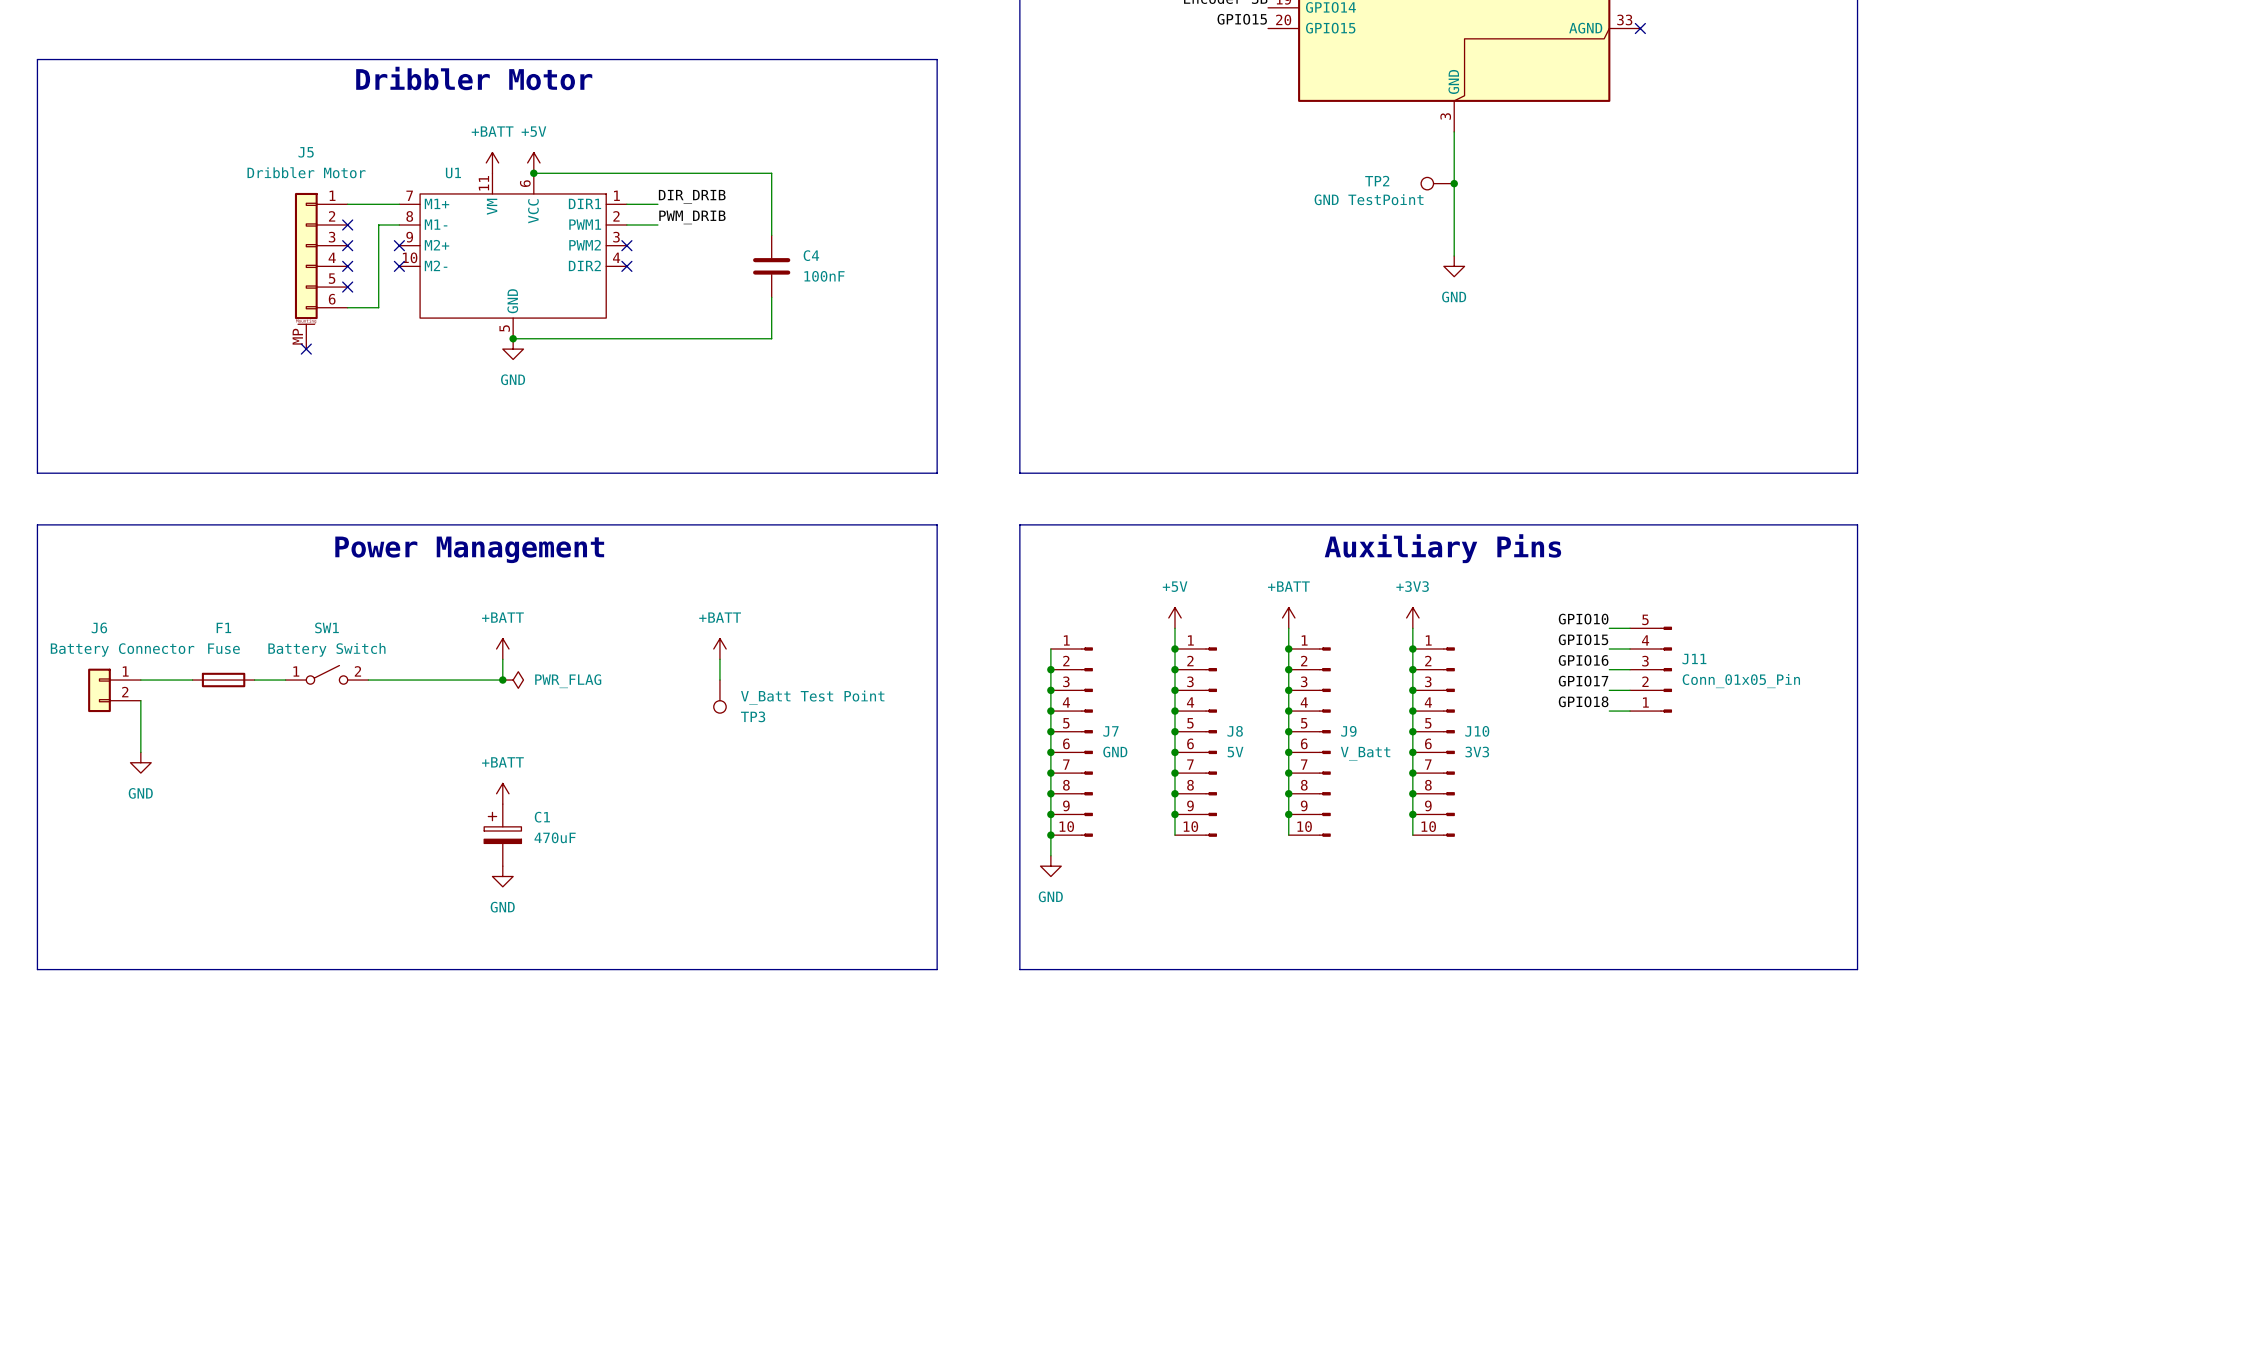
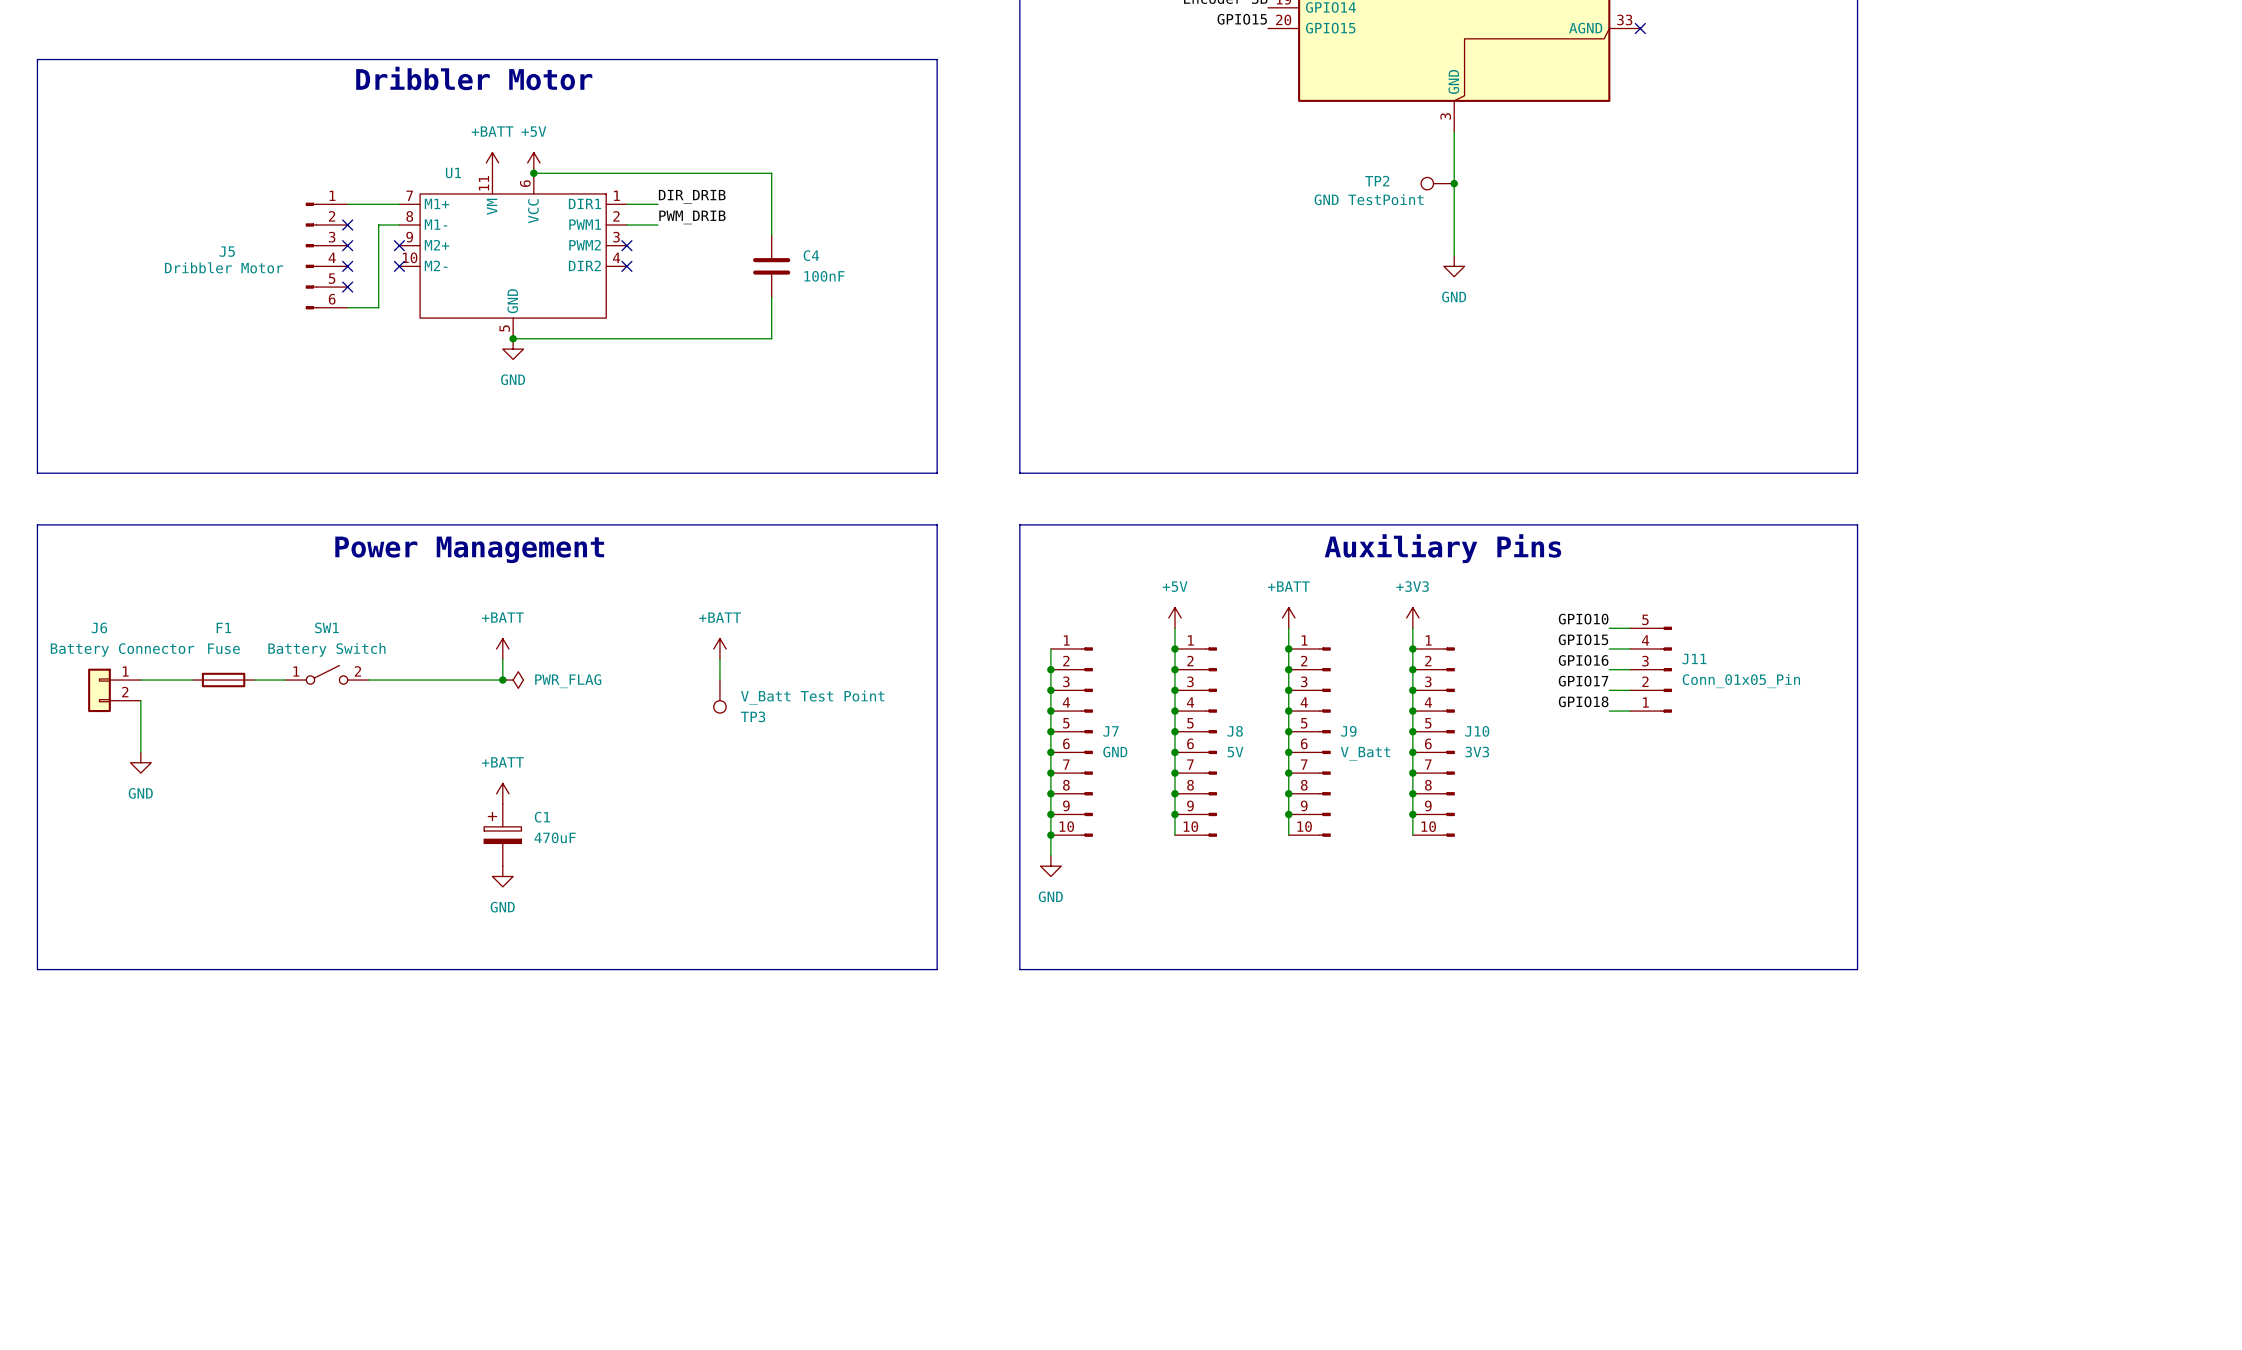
J5 name position: J5 (306, 152) -> J5 (227, 251)
J5 value position: Dribbler Motor (306, 172) -> Dribbler Motor (223, 267)
J5 symbol: [294, 192, 348, 350] -> [305, 202, 348, 310]
no-connect mark: (306, 349) -> none

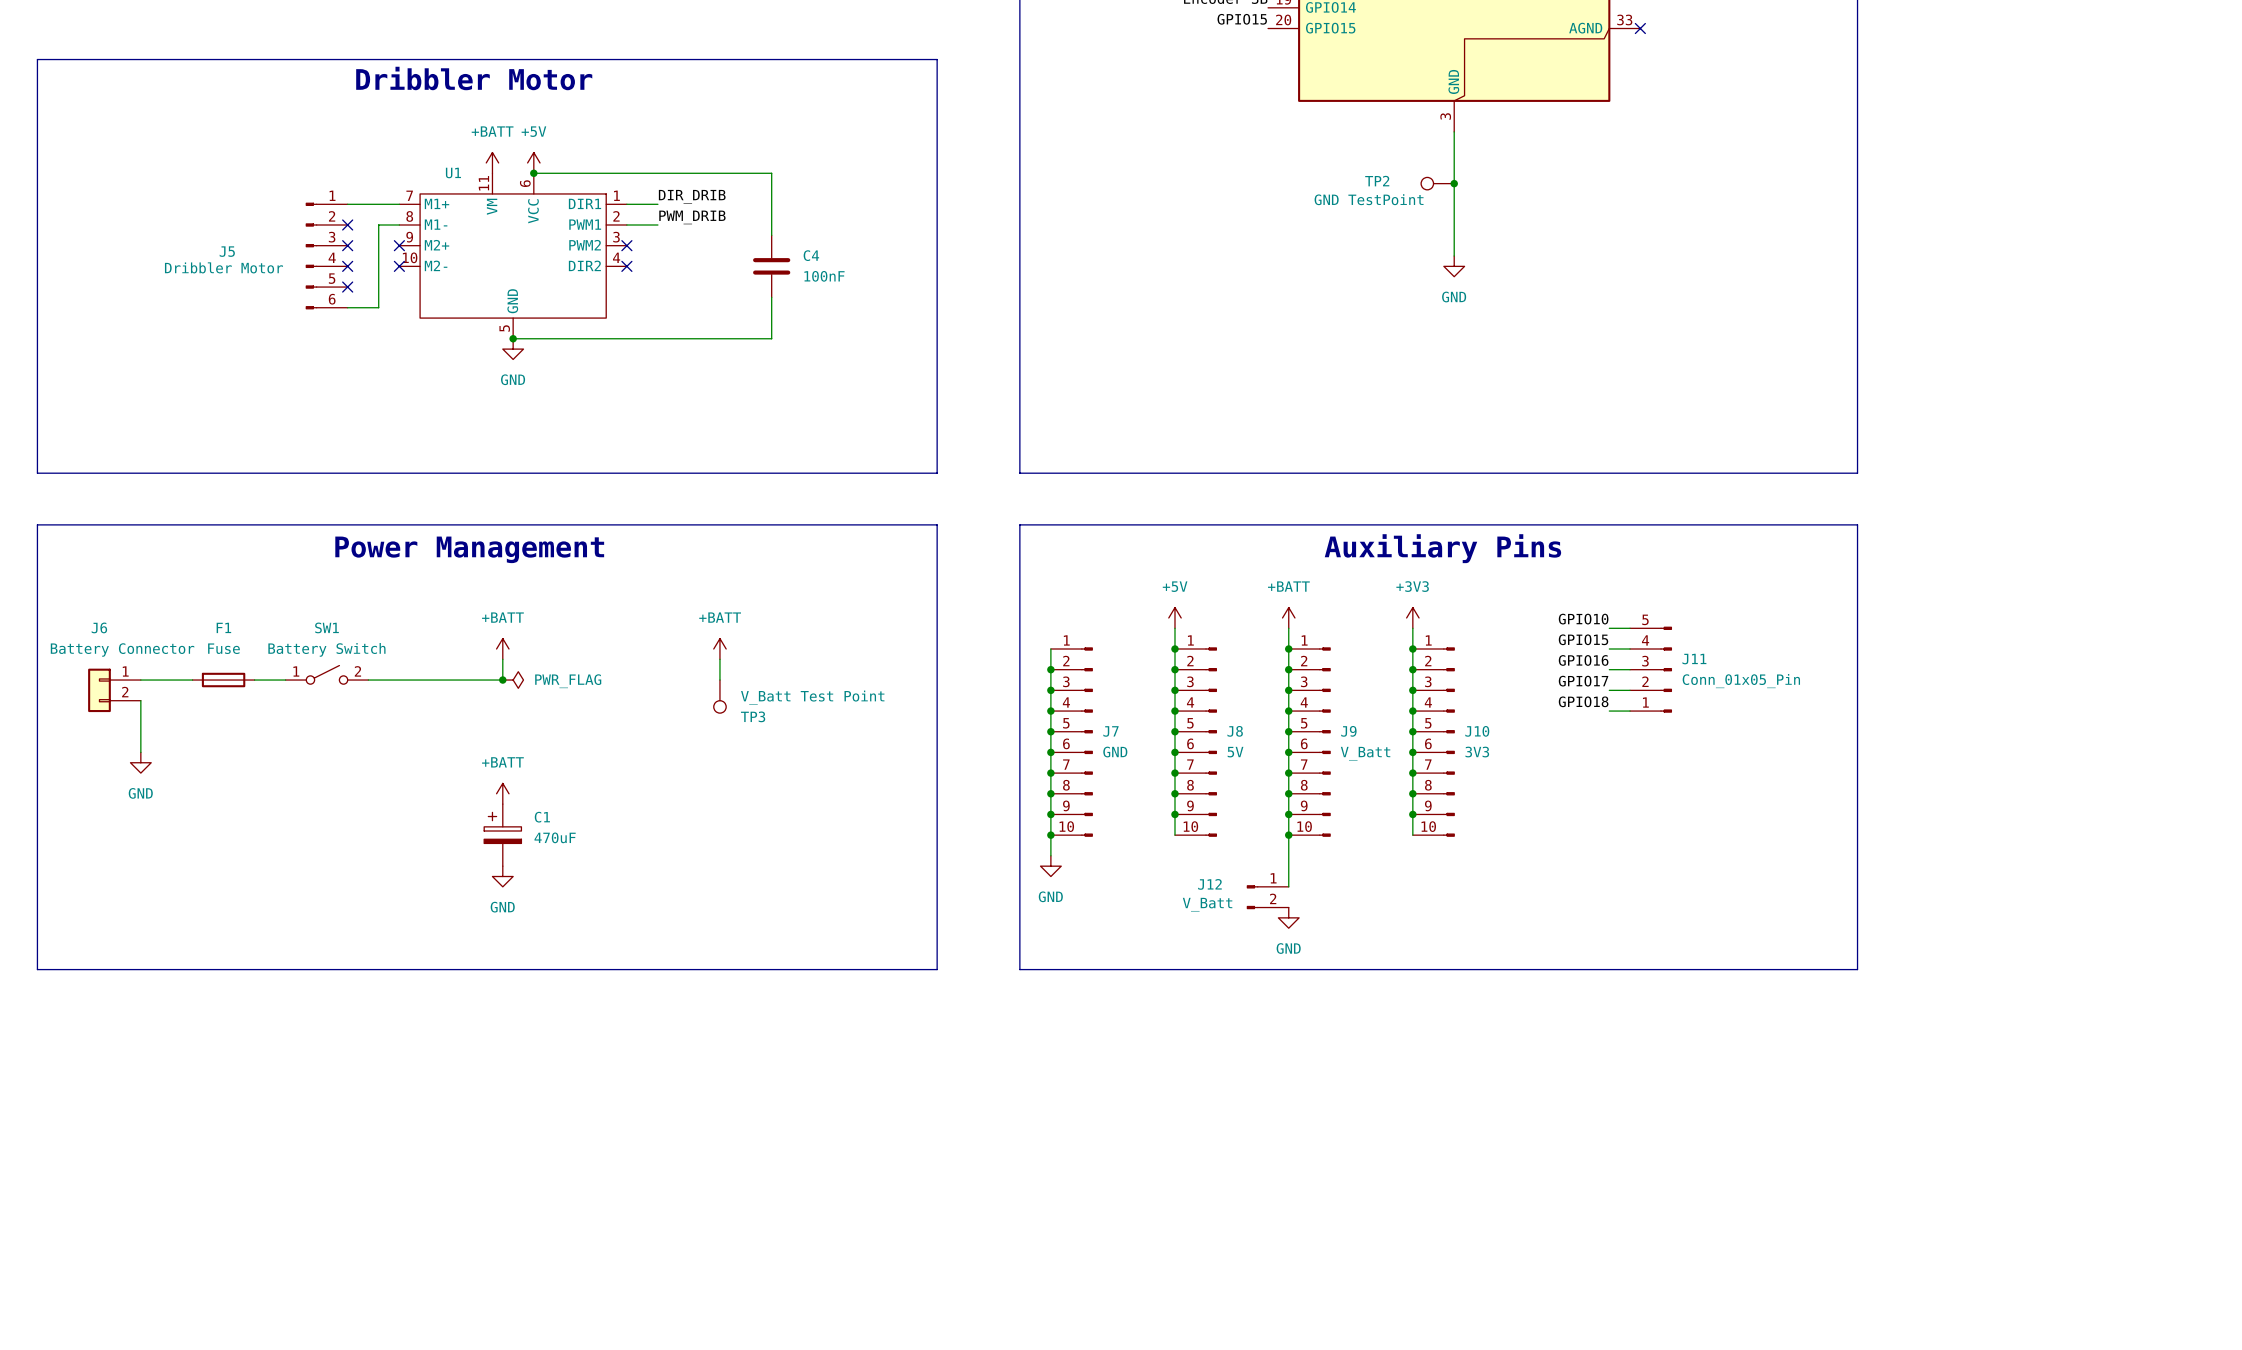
wire: none -> (1288, 835) (1288, 886)
junction: none -> (1288, 835)
J12: none -> V_Batt (1267, 897)
power symbol: none -> GND (1288, 917)

